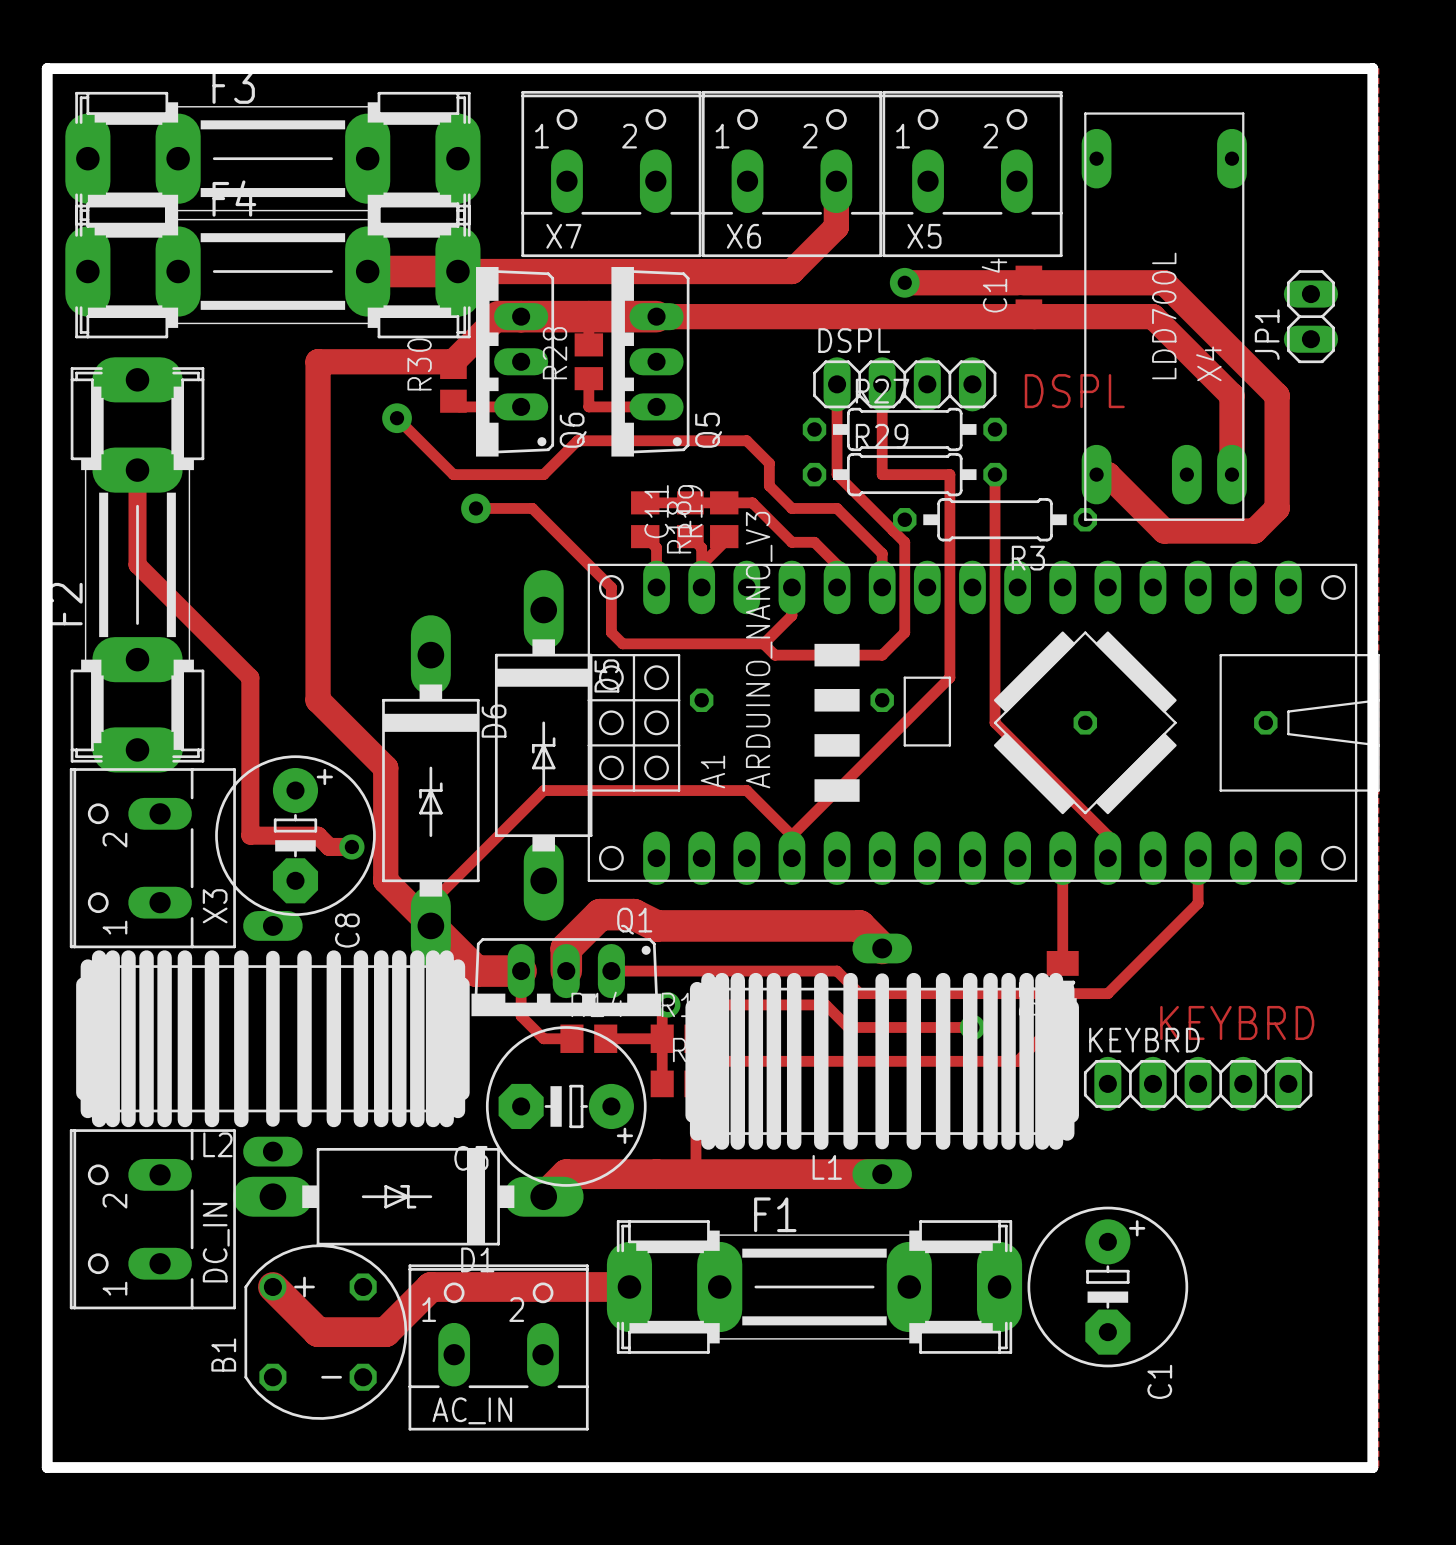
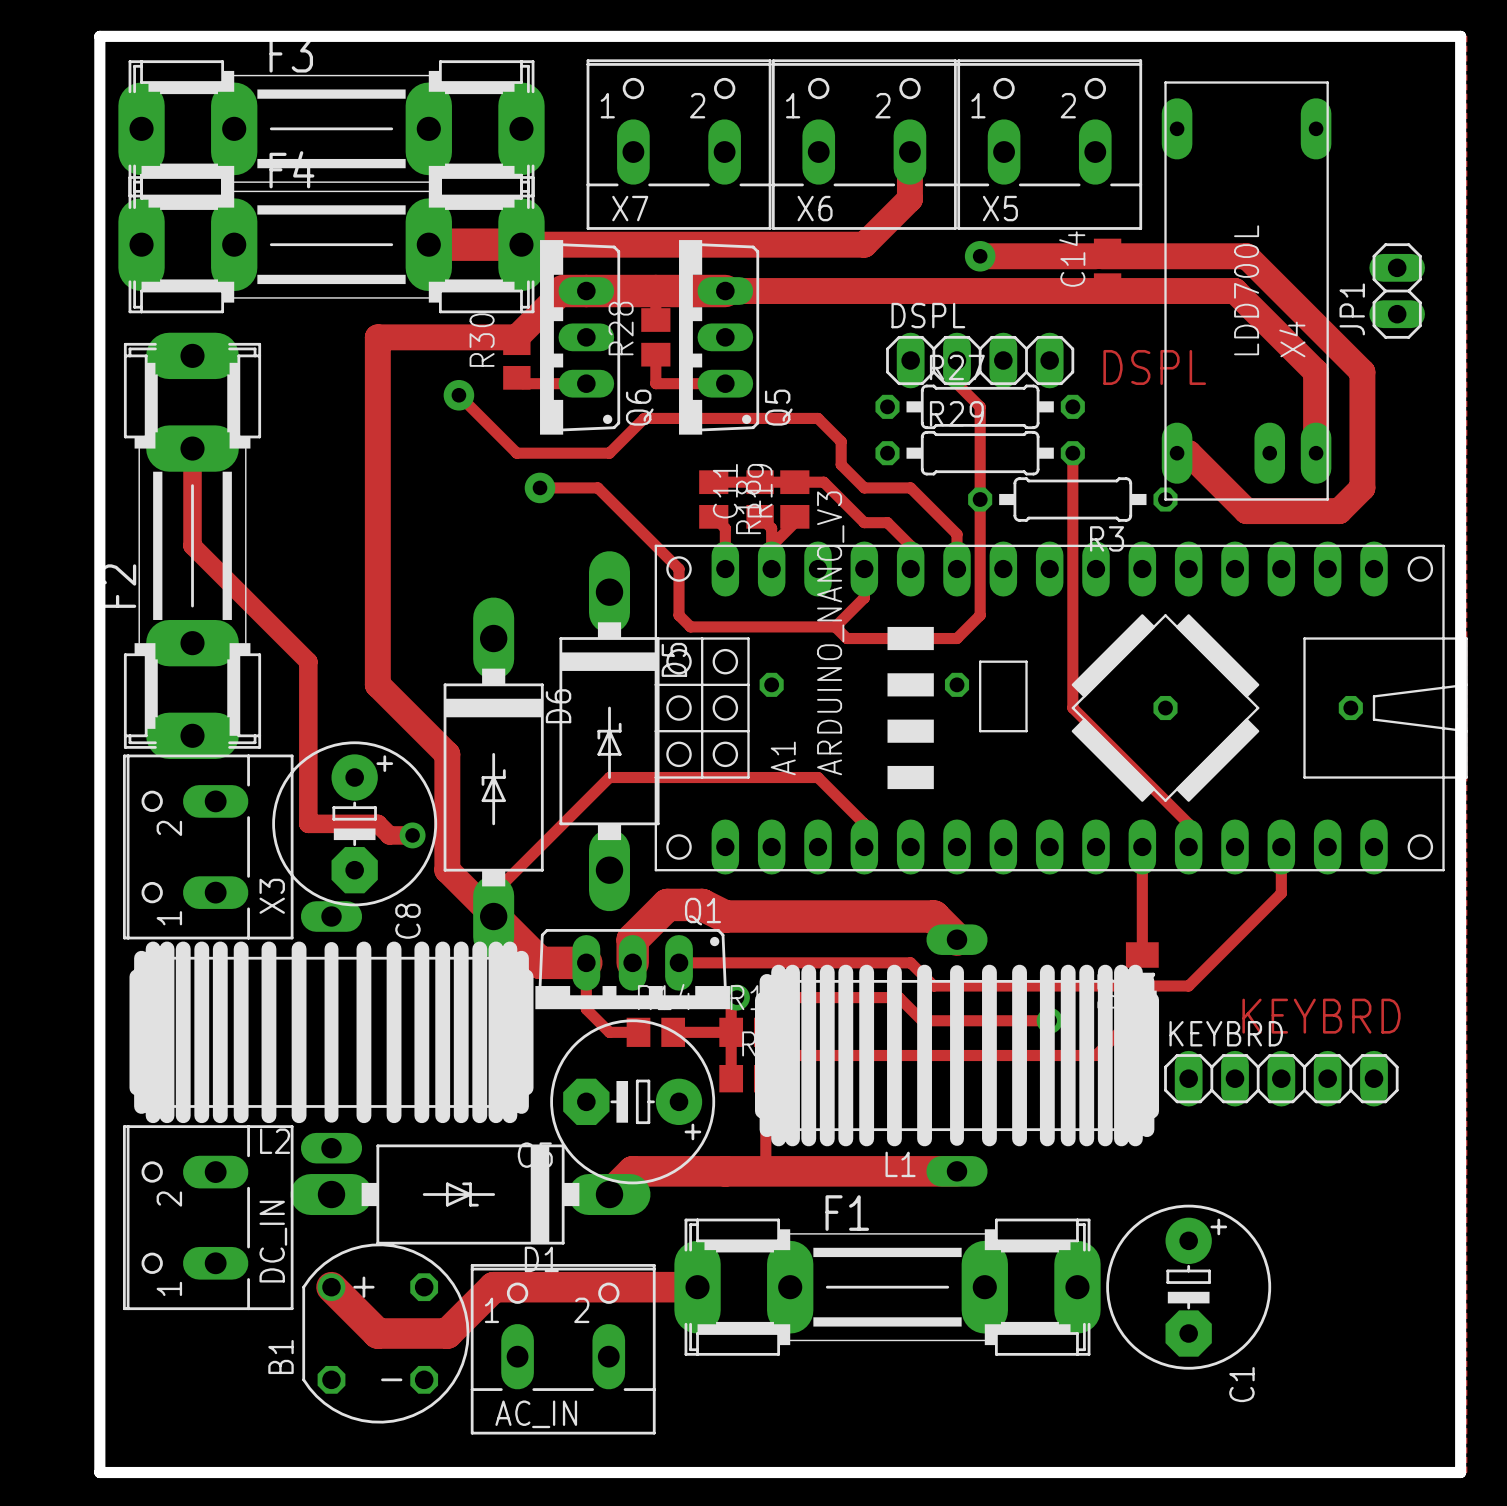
track: (837, 384) (837, 474) (904, 542) -> (957, 383) (980, 406) (980, 522)
track: (882, 406) (882, 474) (949, 474) (949, 677) (791, 835) -> none

